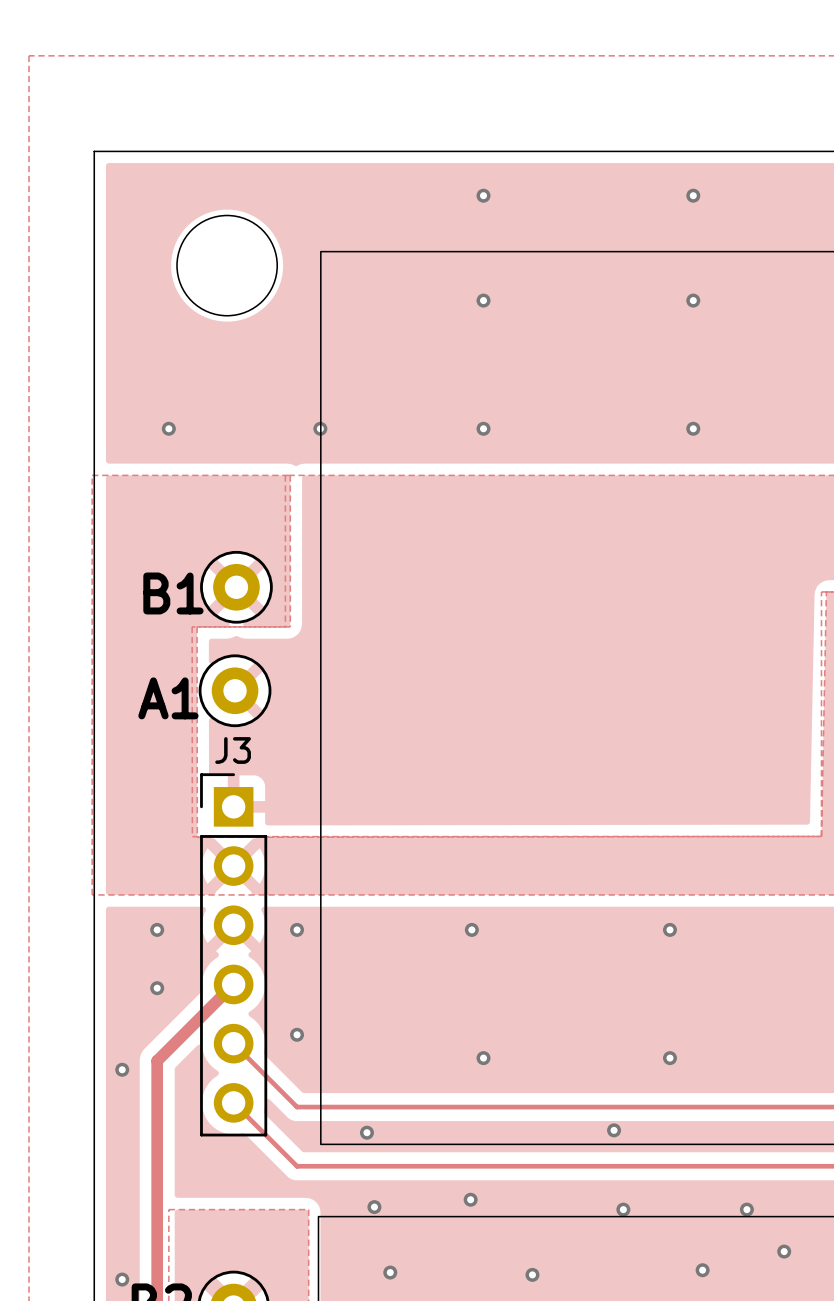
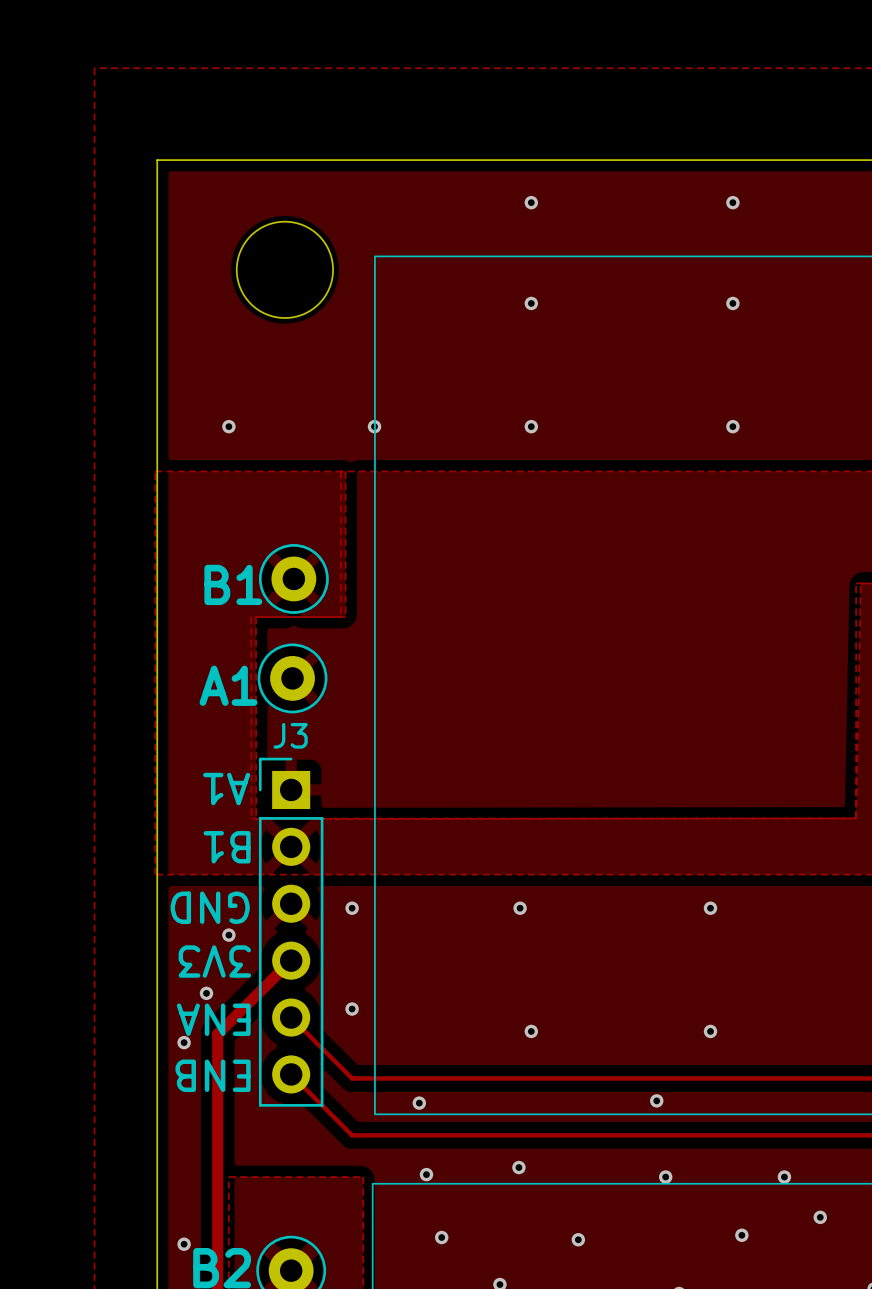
text: none -> A1 (226, 789)
text: none -> B1 (227, 847)
text: none -> GND (210, 907)
via: (157, 929) -> none
via: none -> (228, 935)
text: none -> 3V3 (214, 961)
via: (157, 988) -> none
via: none -> (206, 993)
text: none -> ENA (213, 1019)
text: none -> ENB (213, 1075)

